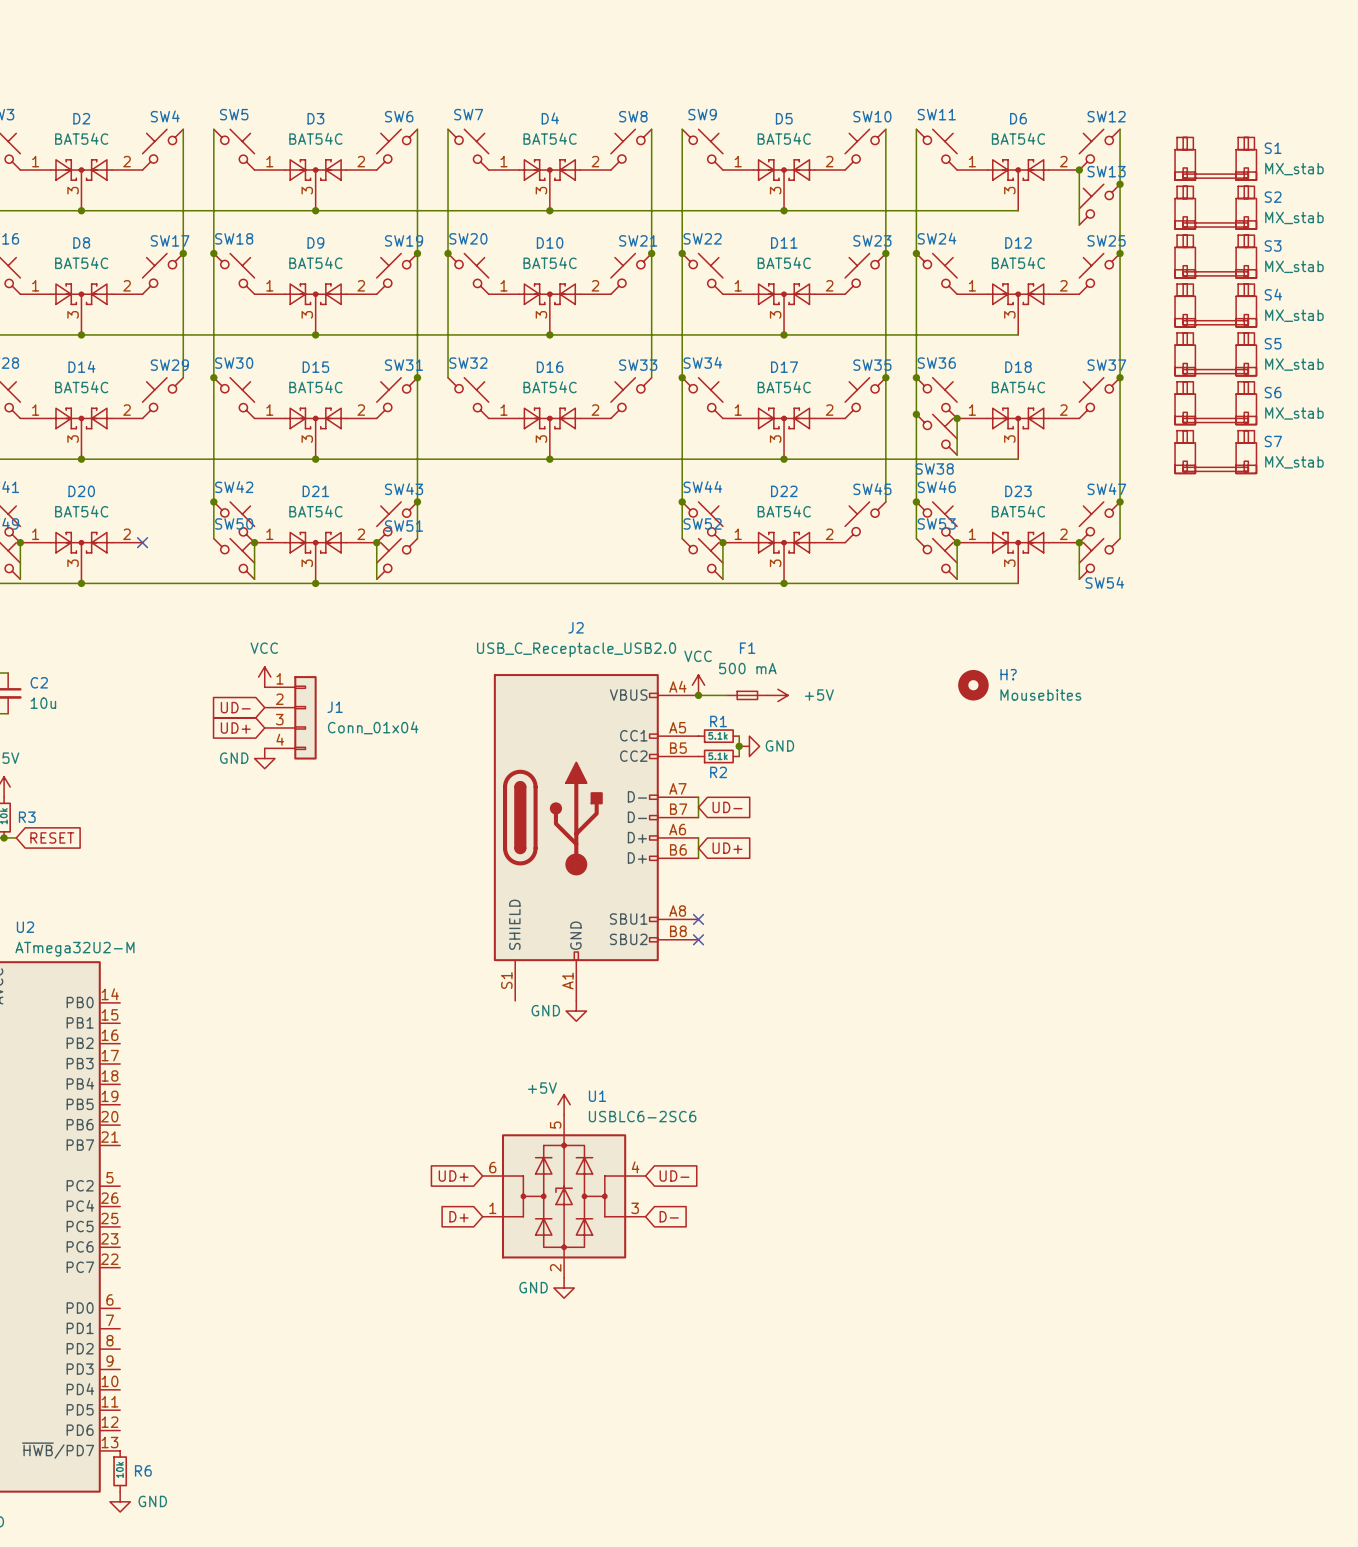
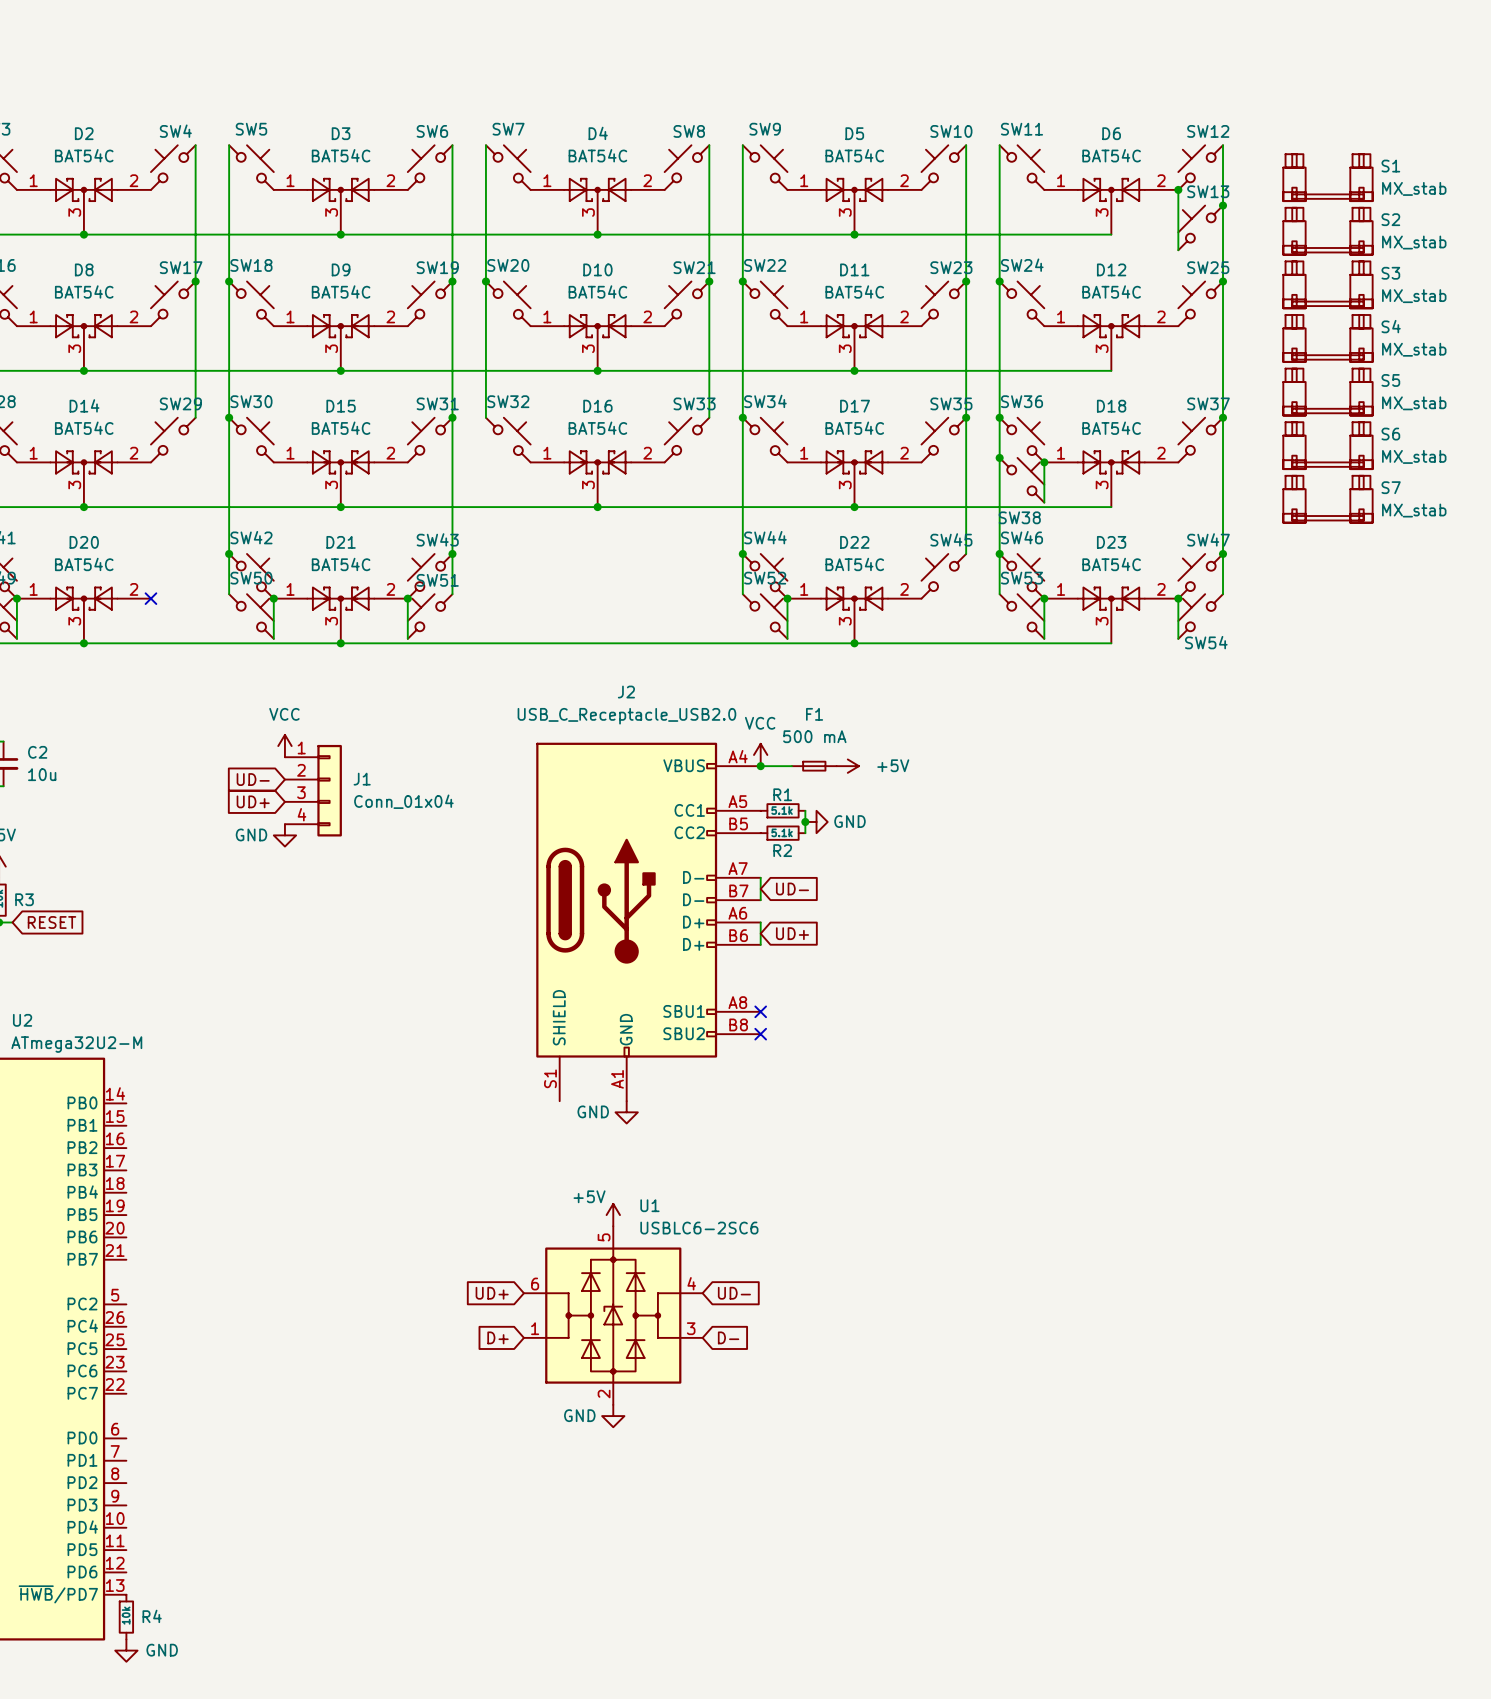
H?: Mousebites (973, 685) -> none
R6 name: R6 (143, 1470) -> R4 (152, 1616)

